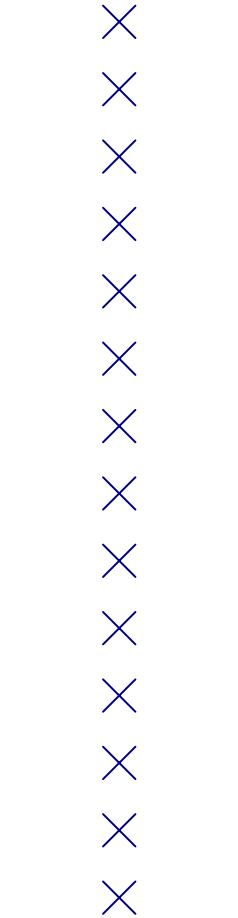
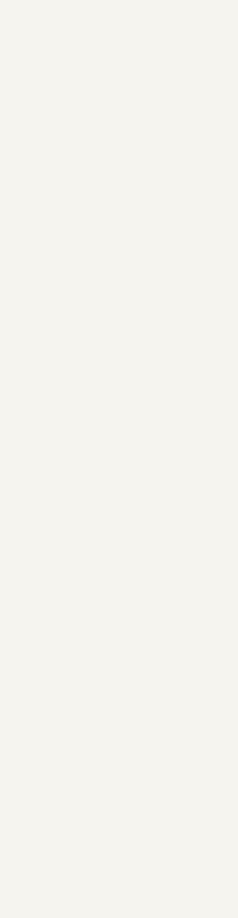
no-connect mark: (119, 21) -> none
no-connect mark: (119, 89) -> none
no-connect mark: (119, 156) -> none
no-connect mark: (119, 223) -> none
no-connect mark: (119, 291) -> none
no-connect mark: (119, 358) -> none
no-connect mark: (119, 426) -> none
no-connect mark: (119, 493) -> none
no-connect mark: (119, 560) -> none
no-connect mark: (119, 628) -> none
no-connect mark: (119, 695) -> none
no-connect mark: (119, 762) -> none
no-connect mark: (119, 830) -> none
no-connect mark: (119, 897) -> none

